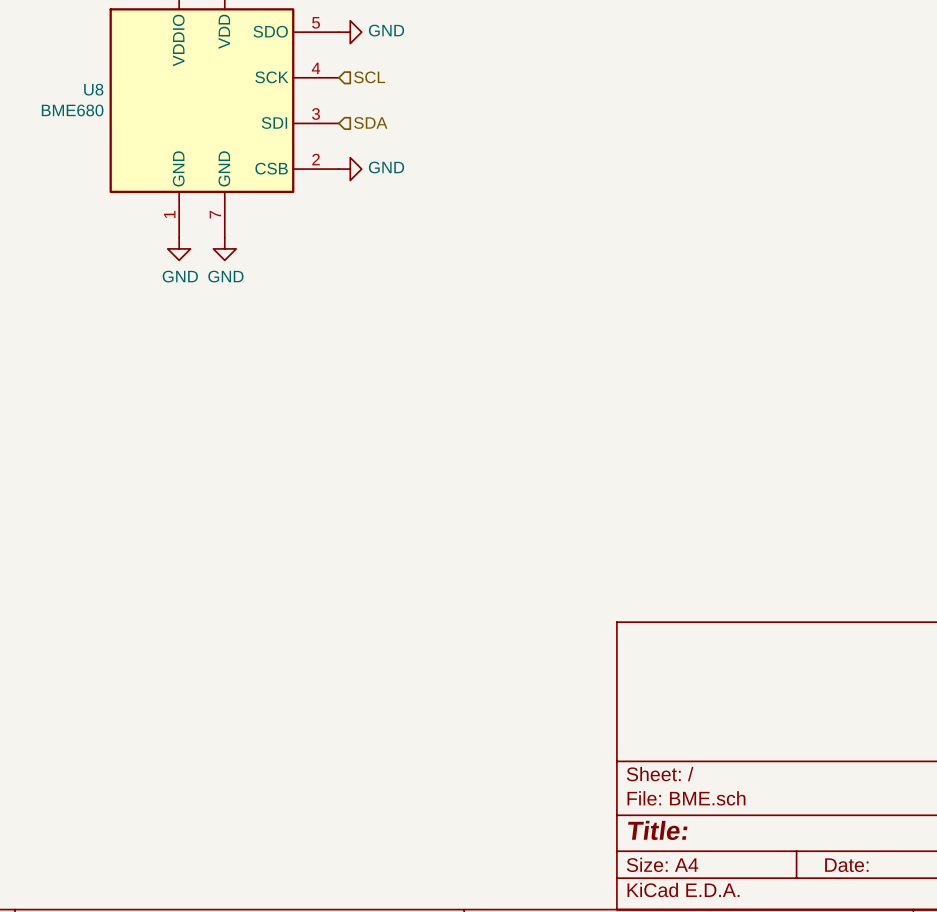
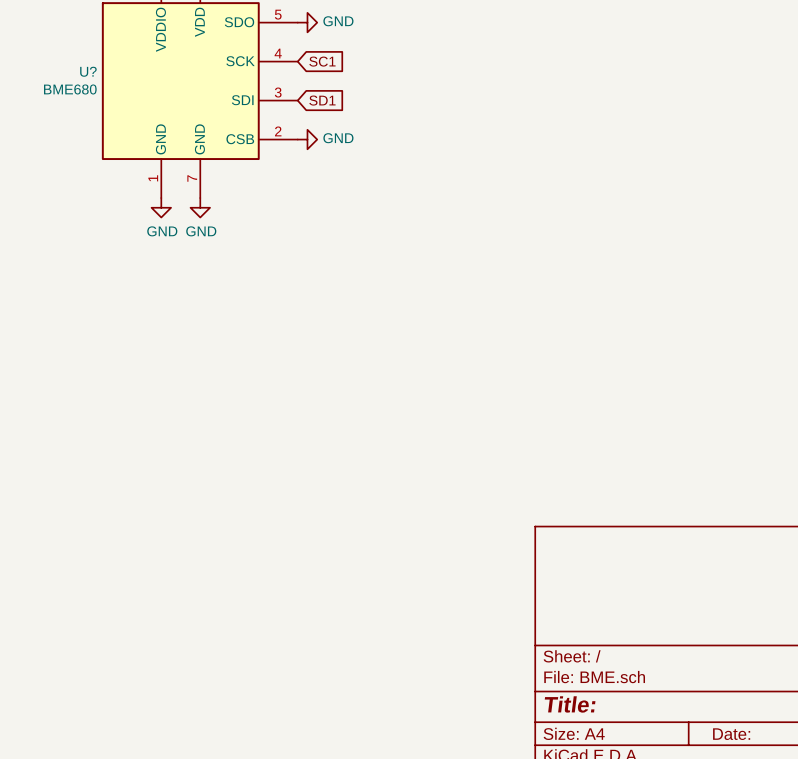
global label: none -> SC1 (322, 61)
hierarchical label: SCL (369, 77) -> none
U8 name: U8 (93, 89) -> U? (88, 71)
global label: none -> SD1 (322, 100)
hierarchical label: SDA (370, 123) -> none

